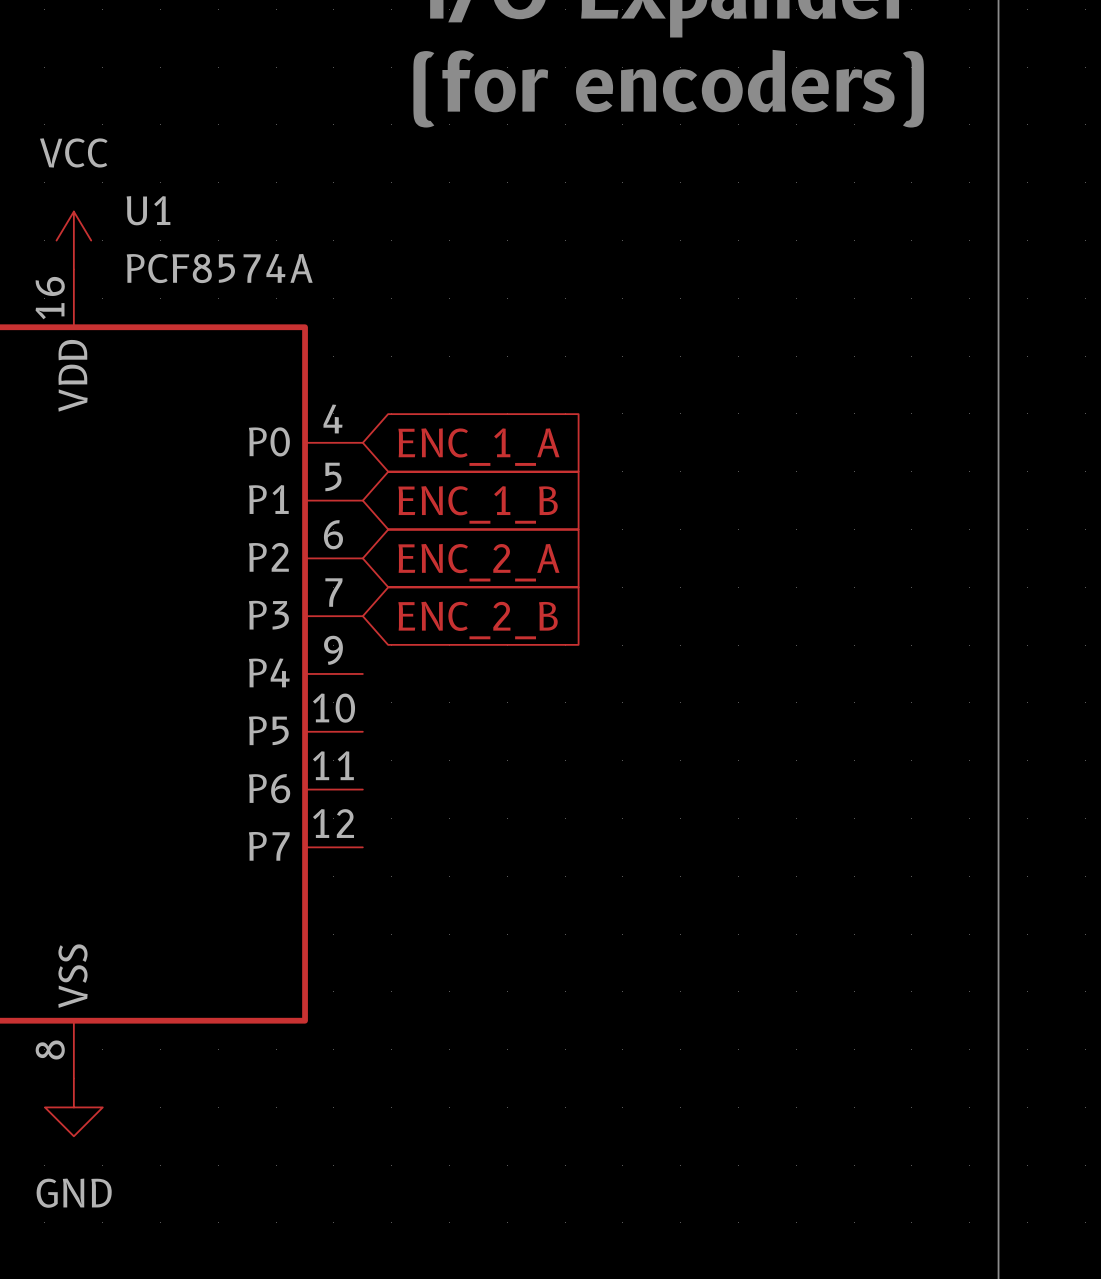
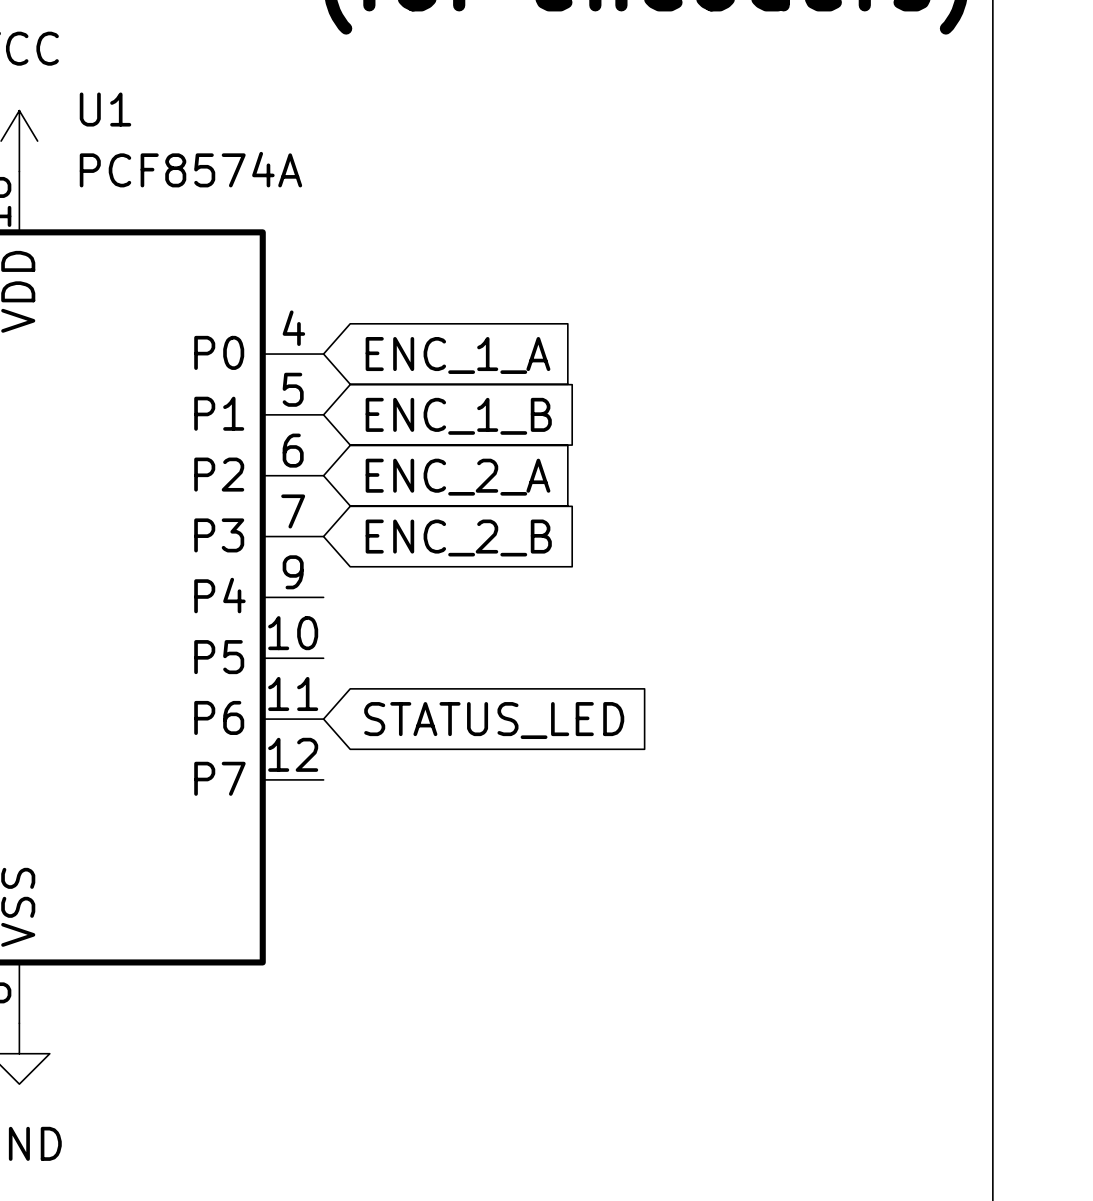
global label: none -> STATUS_LED (494, 720)

